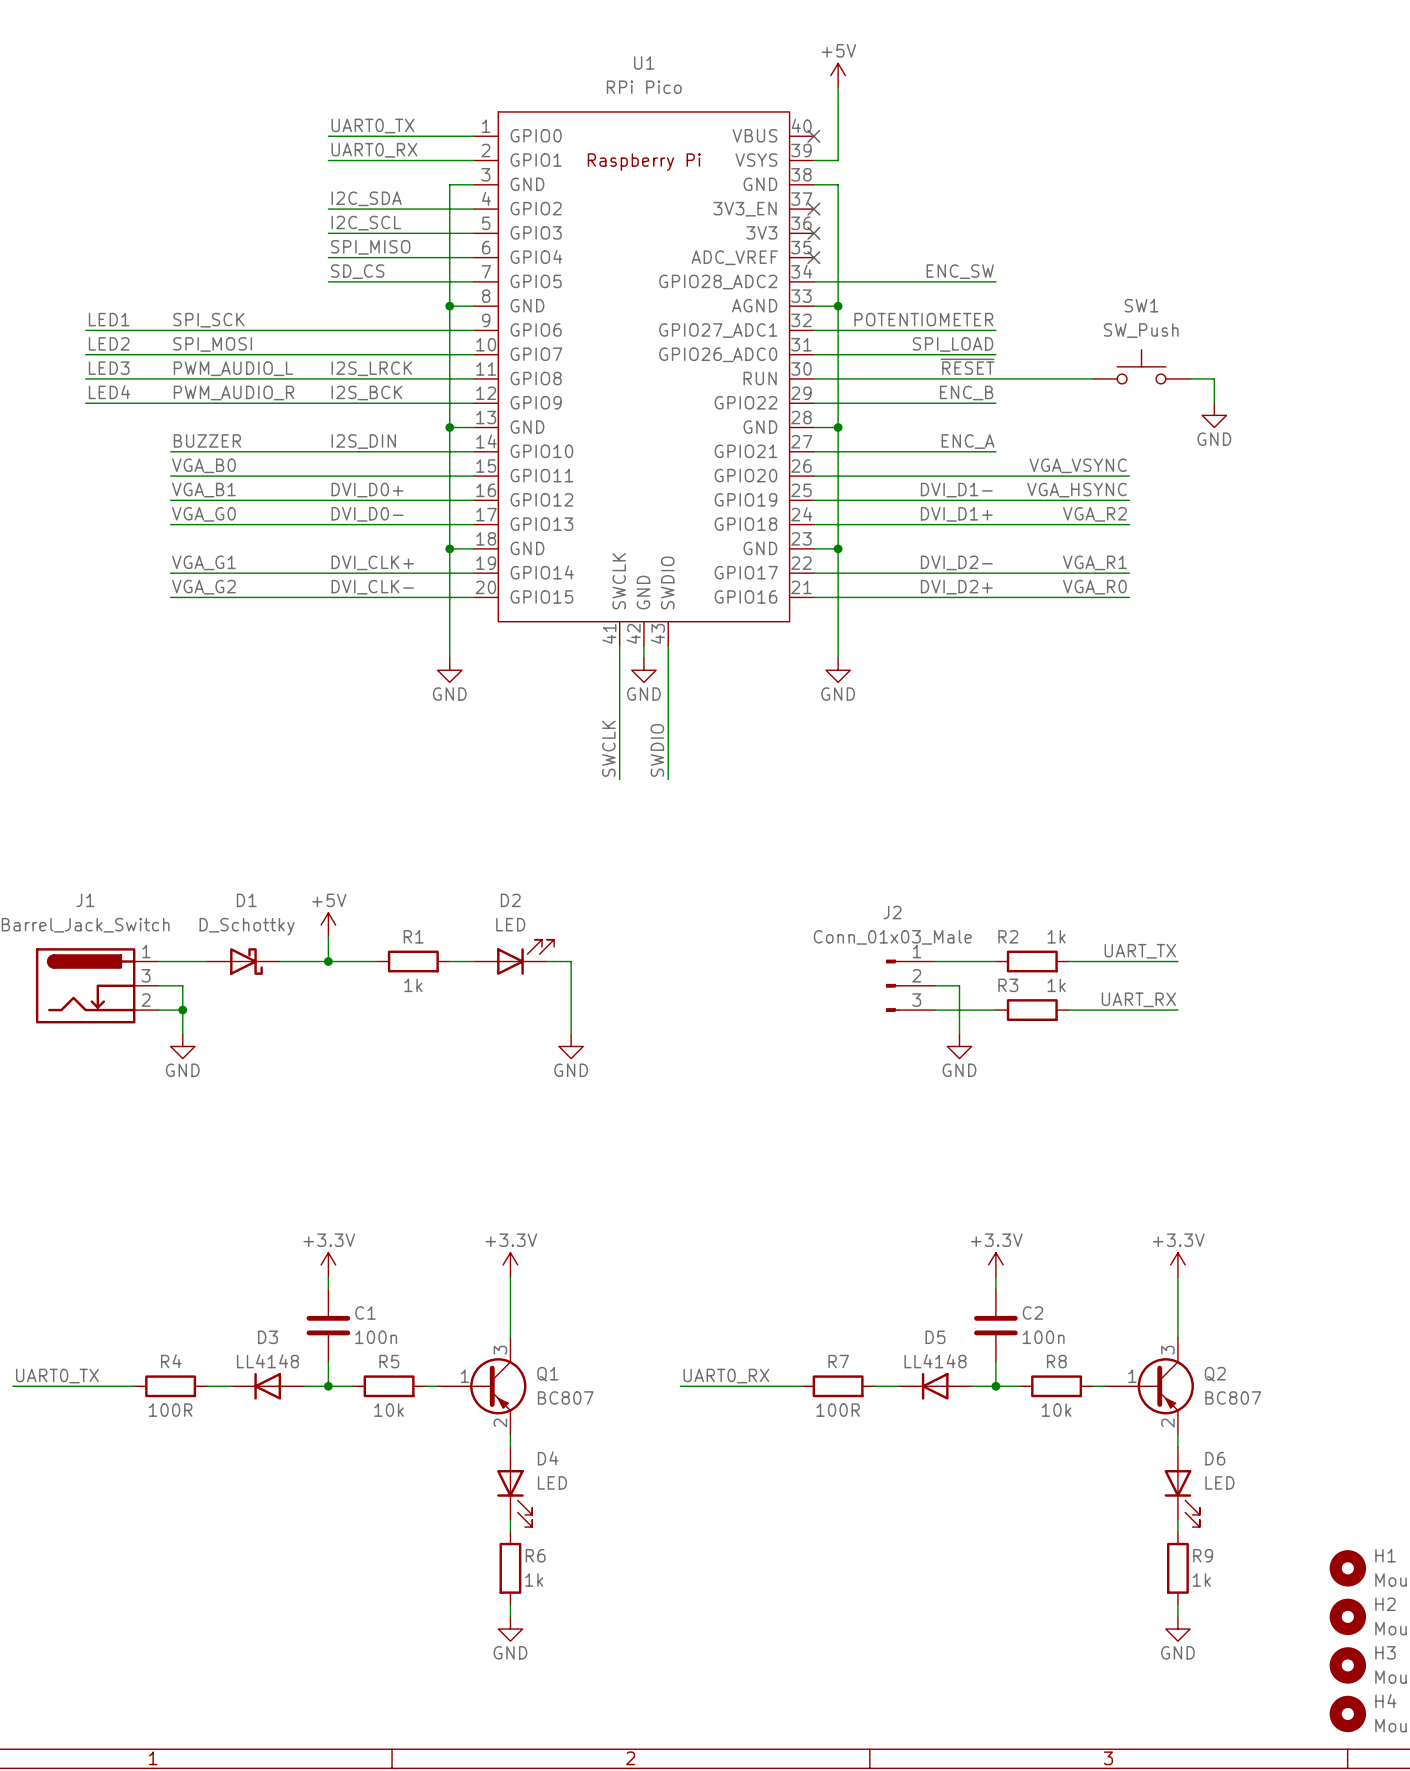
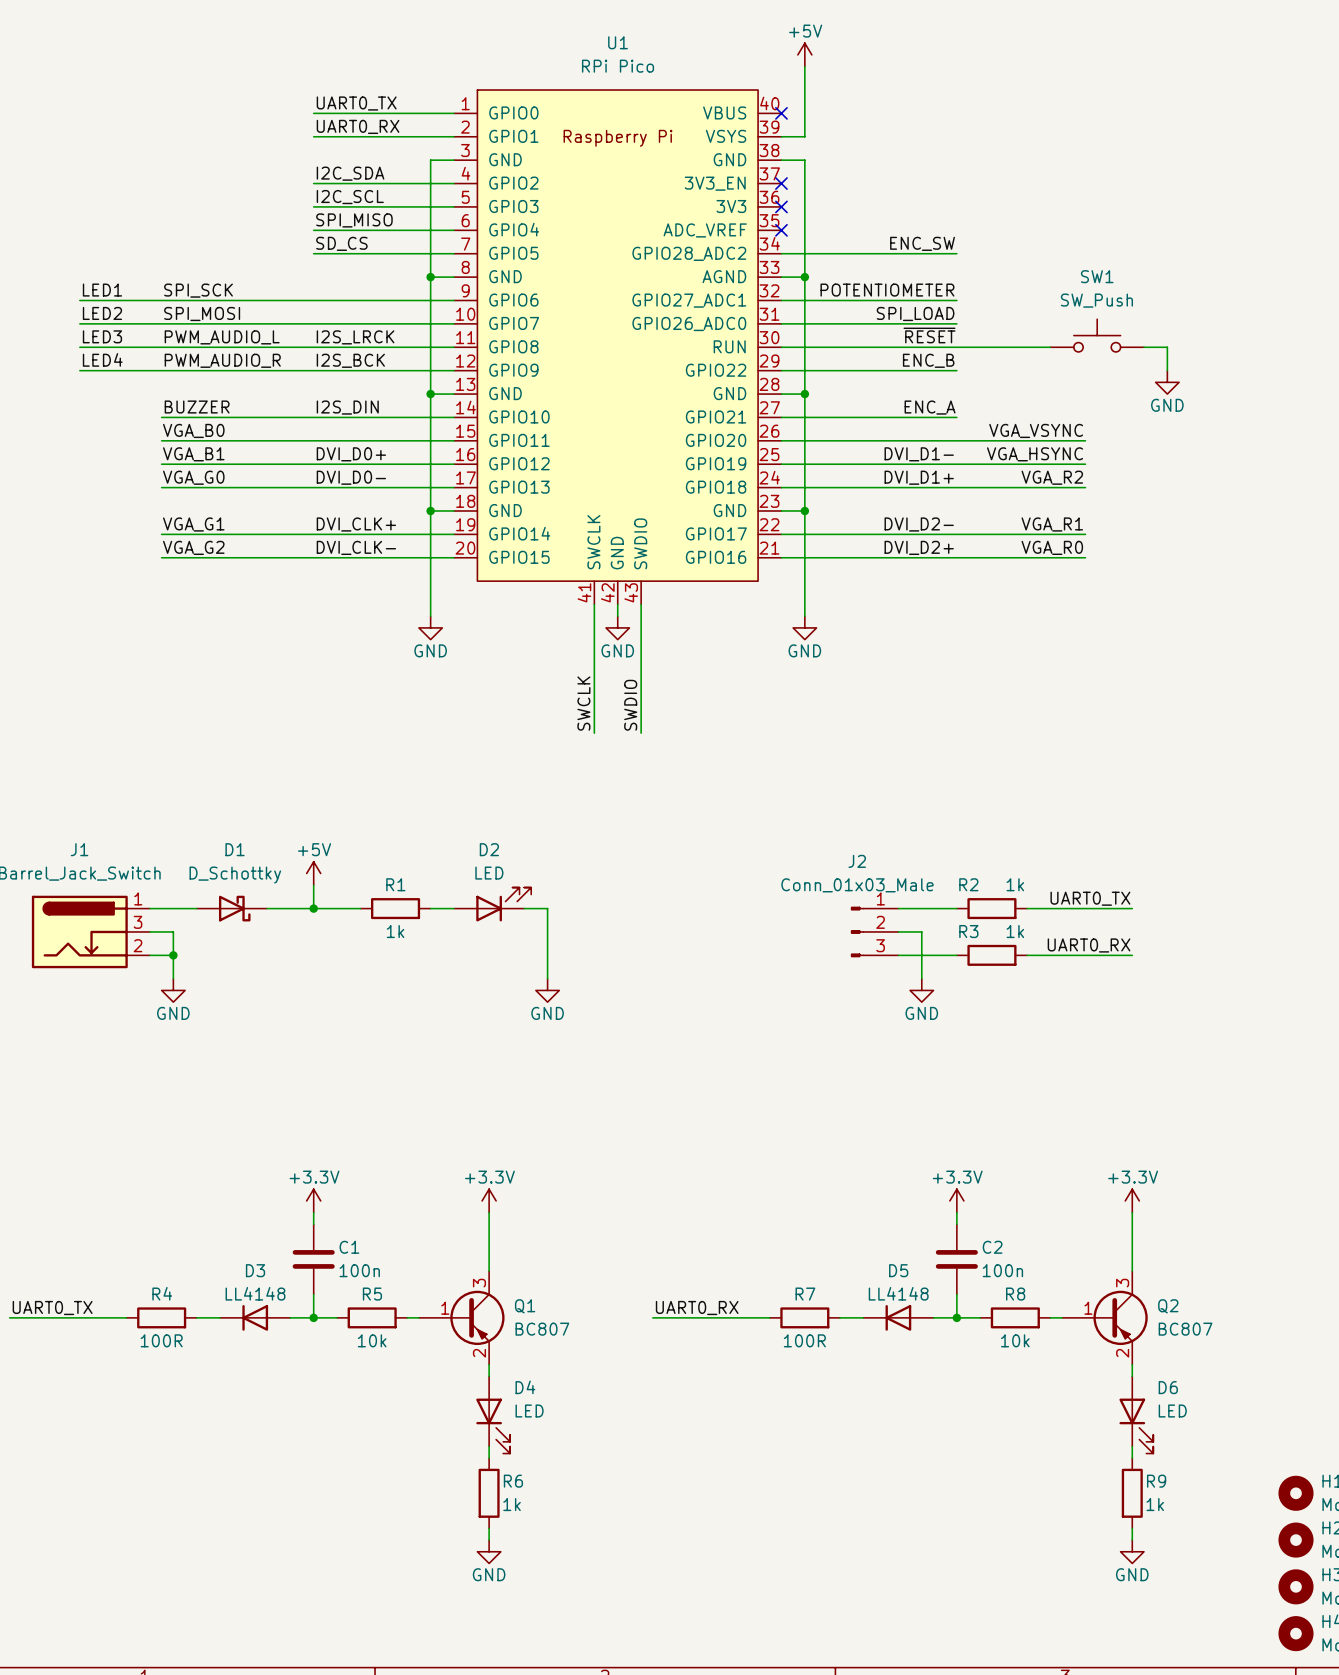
label: UART_TX (1140, 951) -> UART0_TX (1090, 898)
label: UART_RX (1138, 999) -> UART0_RX (1089, 945)

